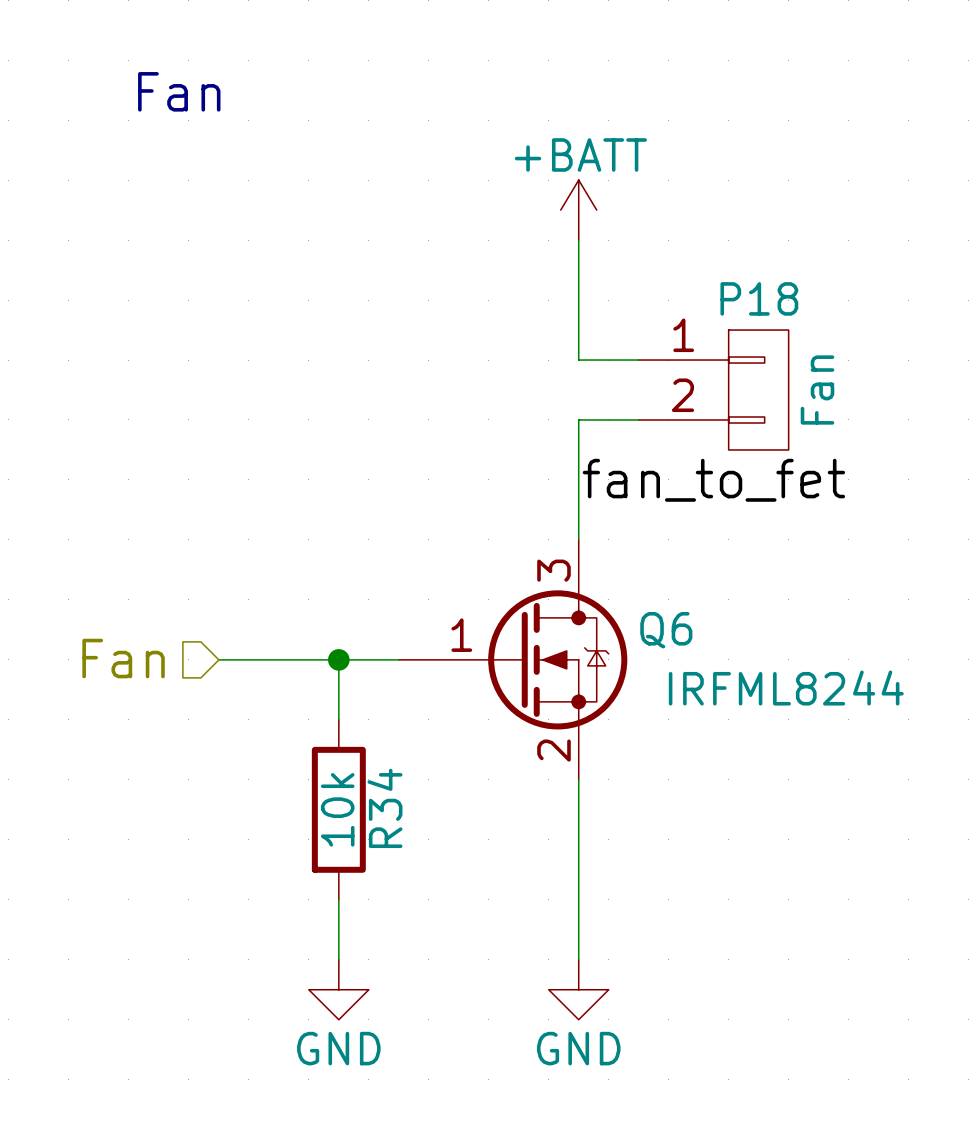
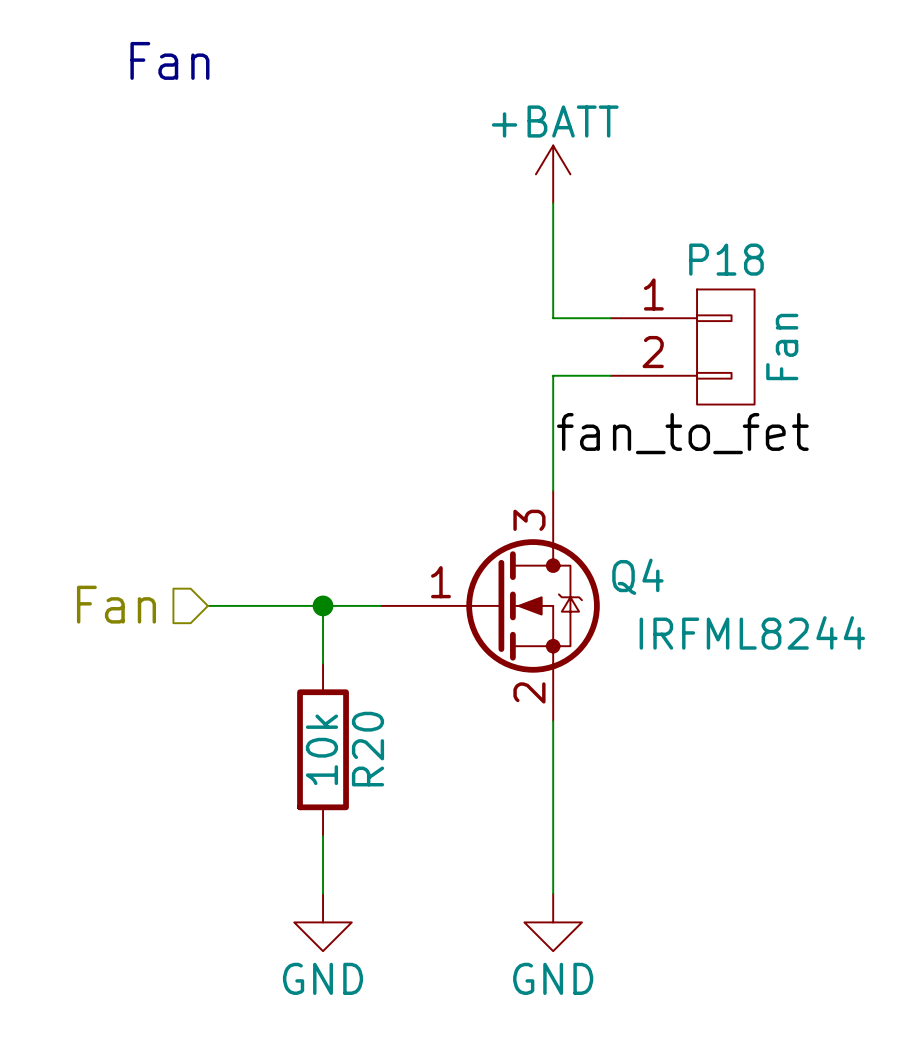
Q6 name: Q6 (666, 630) -> Q4 (637, 576)
R34 name: R34 (384, 808) -> R20 (367, 749)

